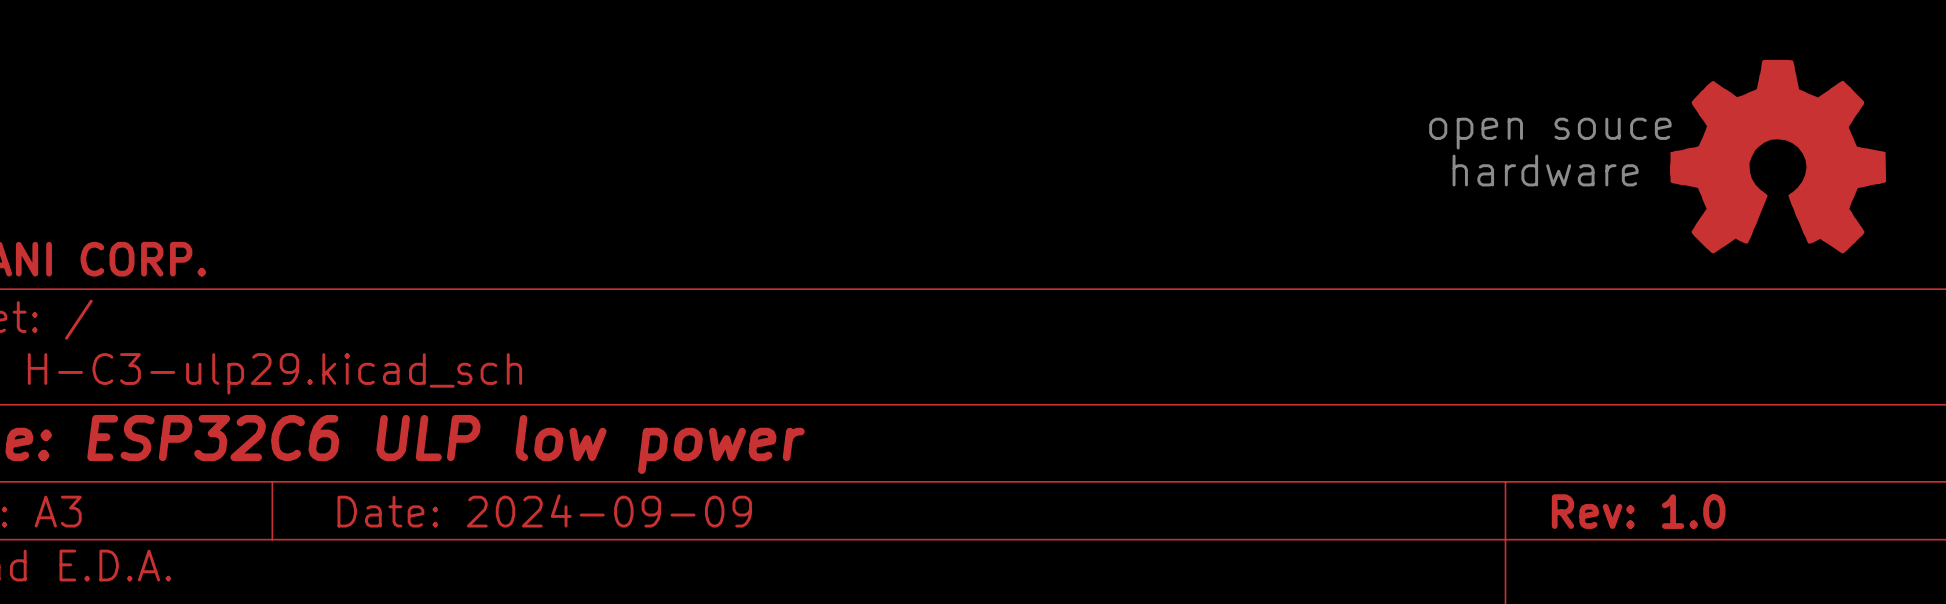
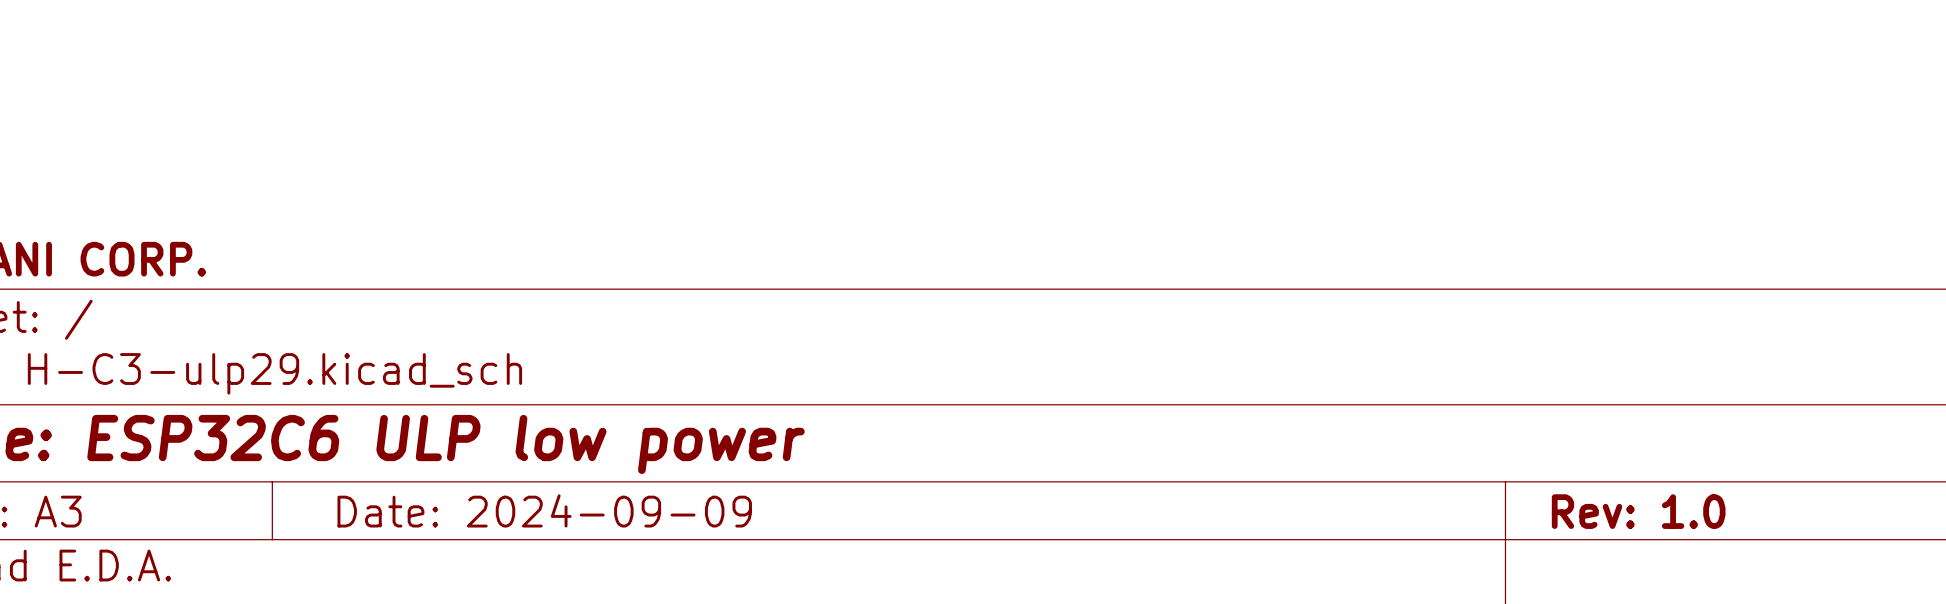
text: open souce (1550, 133) -> none
power symbol: (1778, 156) -> none
text: hardware (1545, 170) -> none

